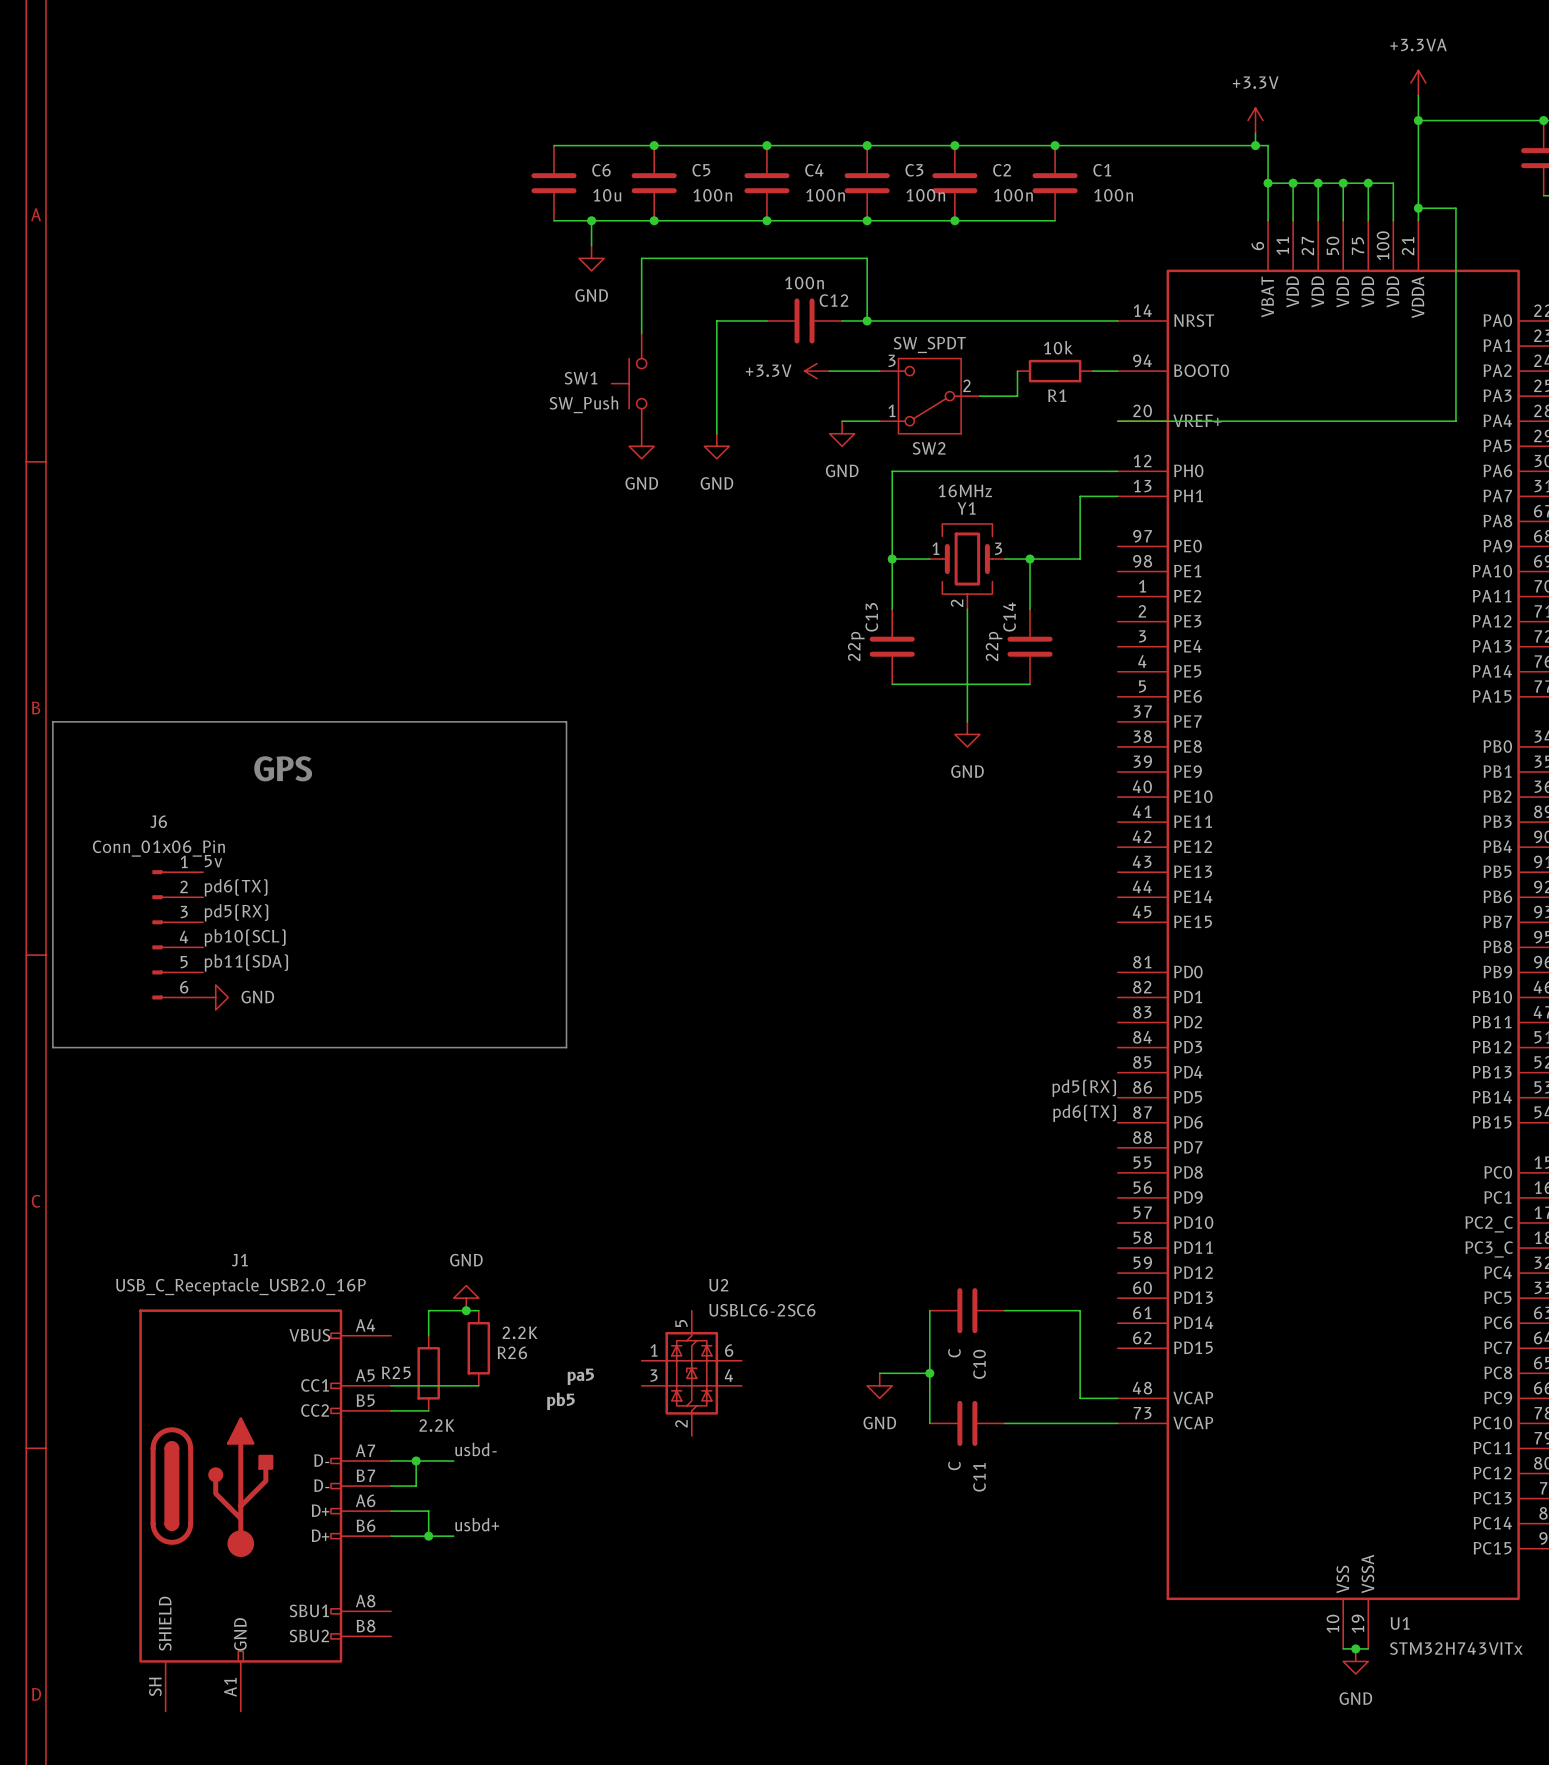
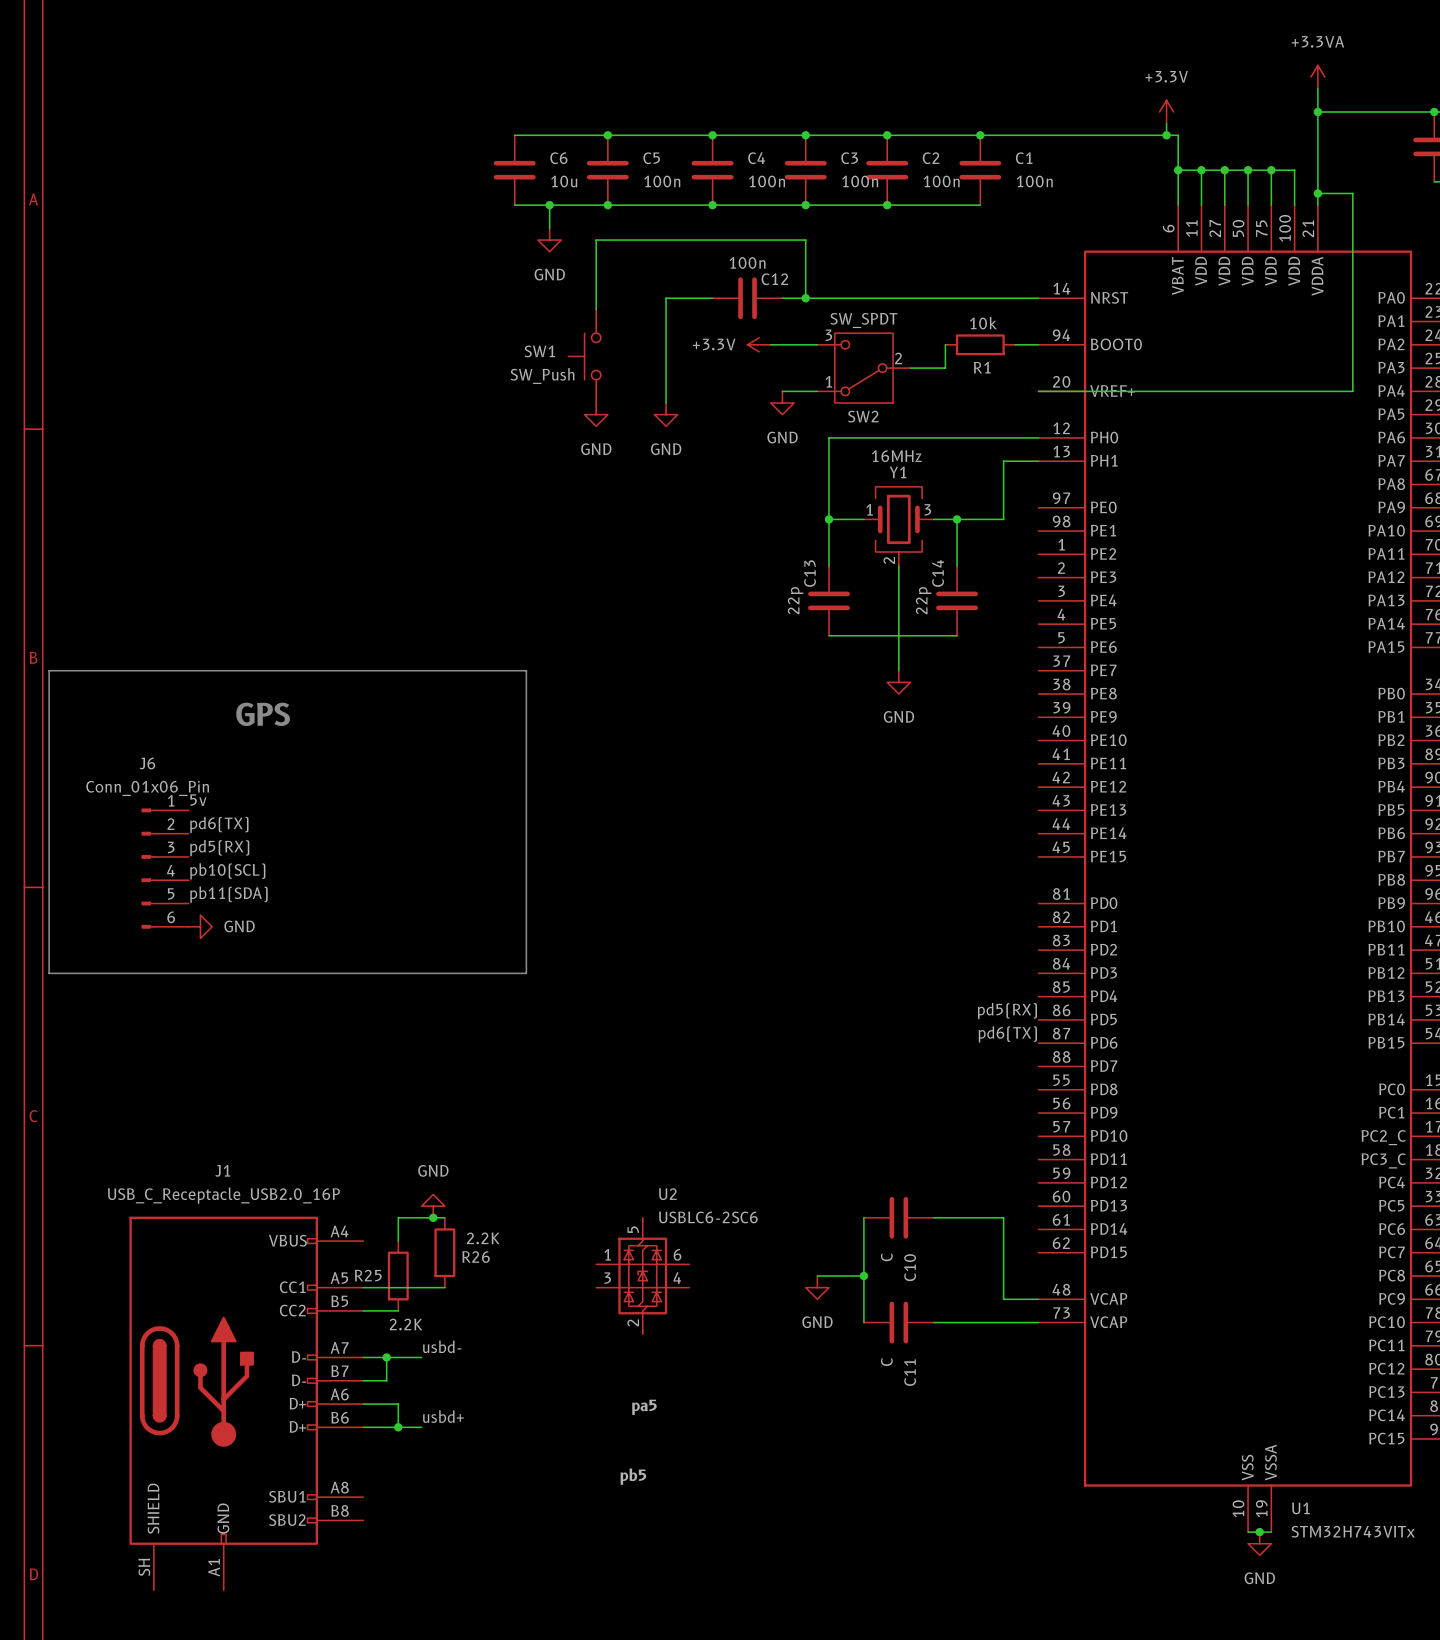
label position: pa5 (580, 1376) -> pa5 (644, 1407)
label position: pb5 (560, 1401) -> pb5 (633, 1476)

